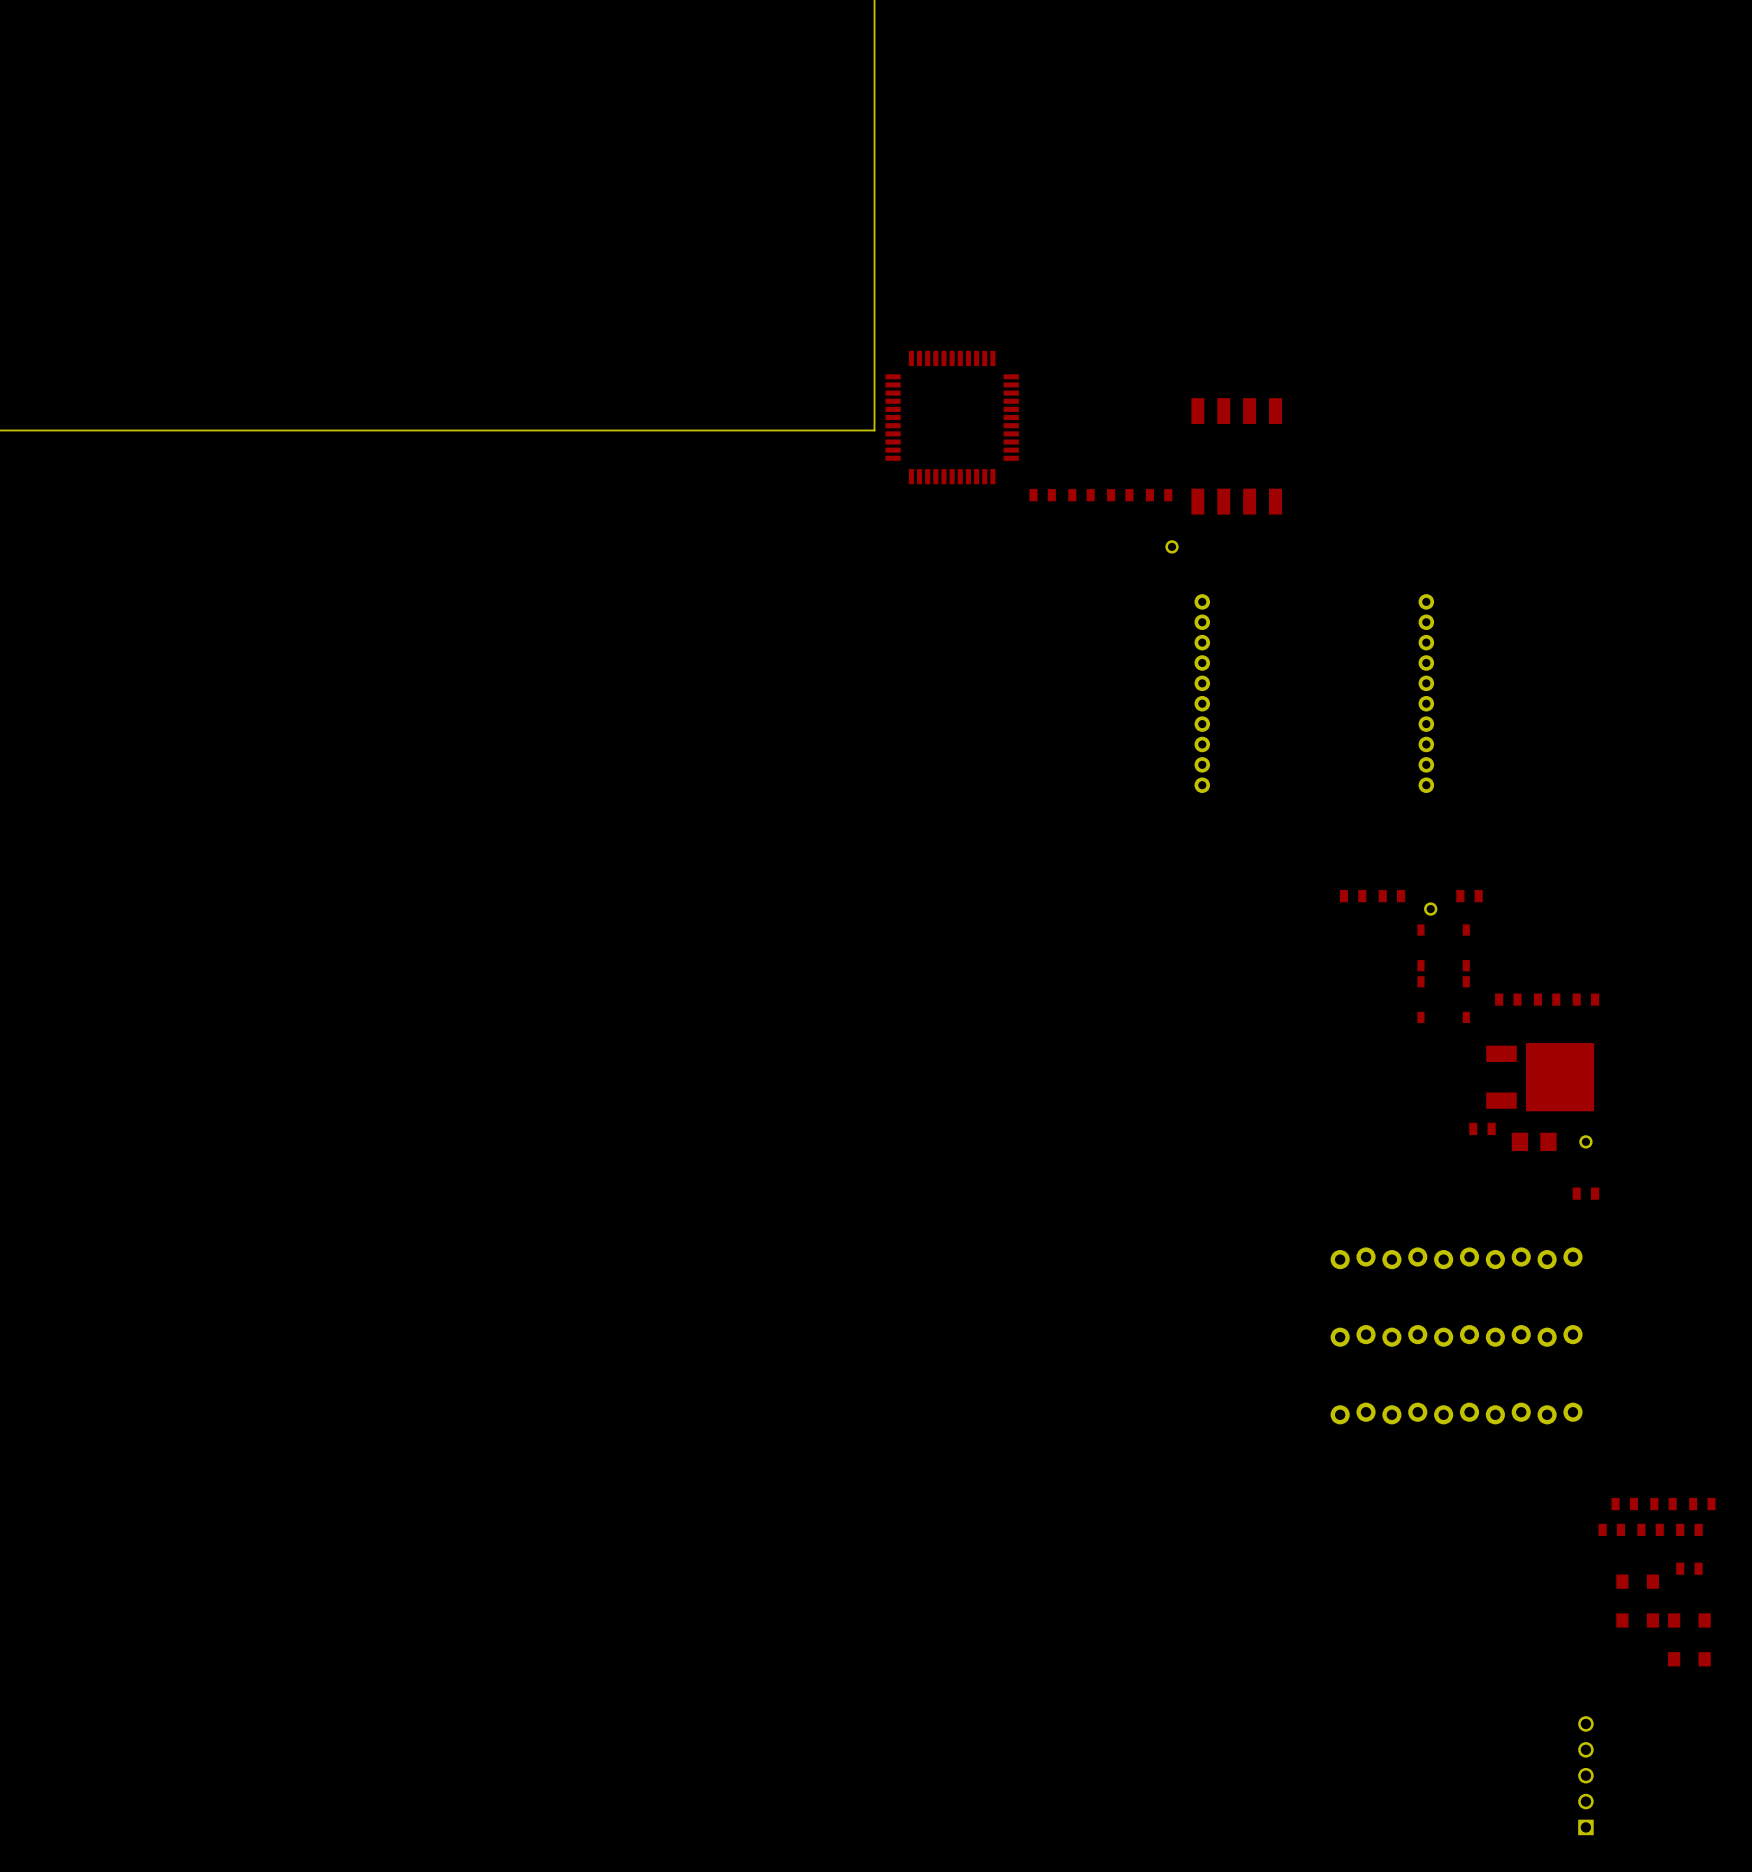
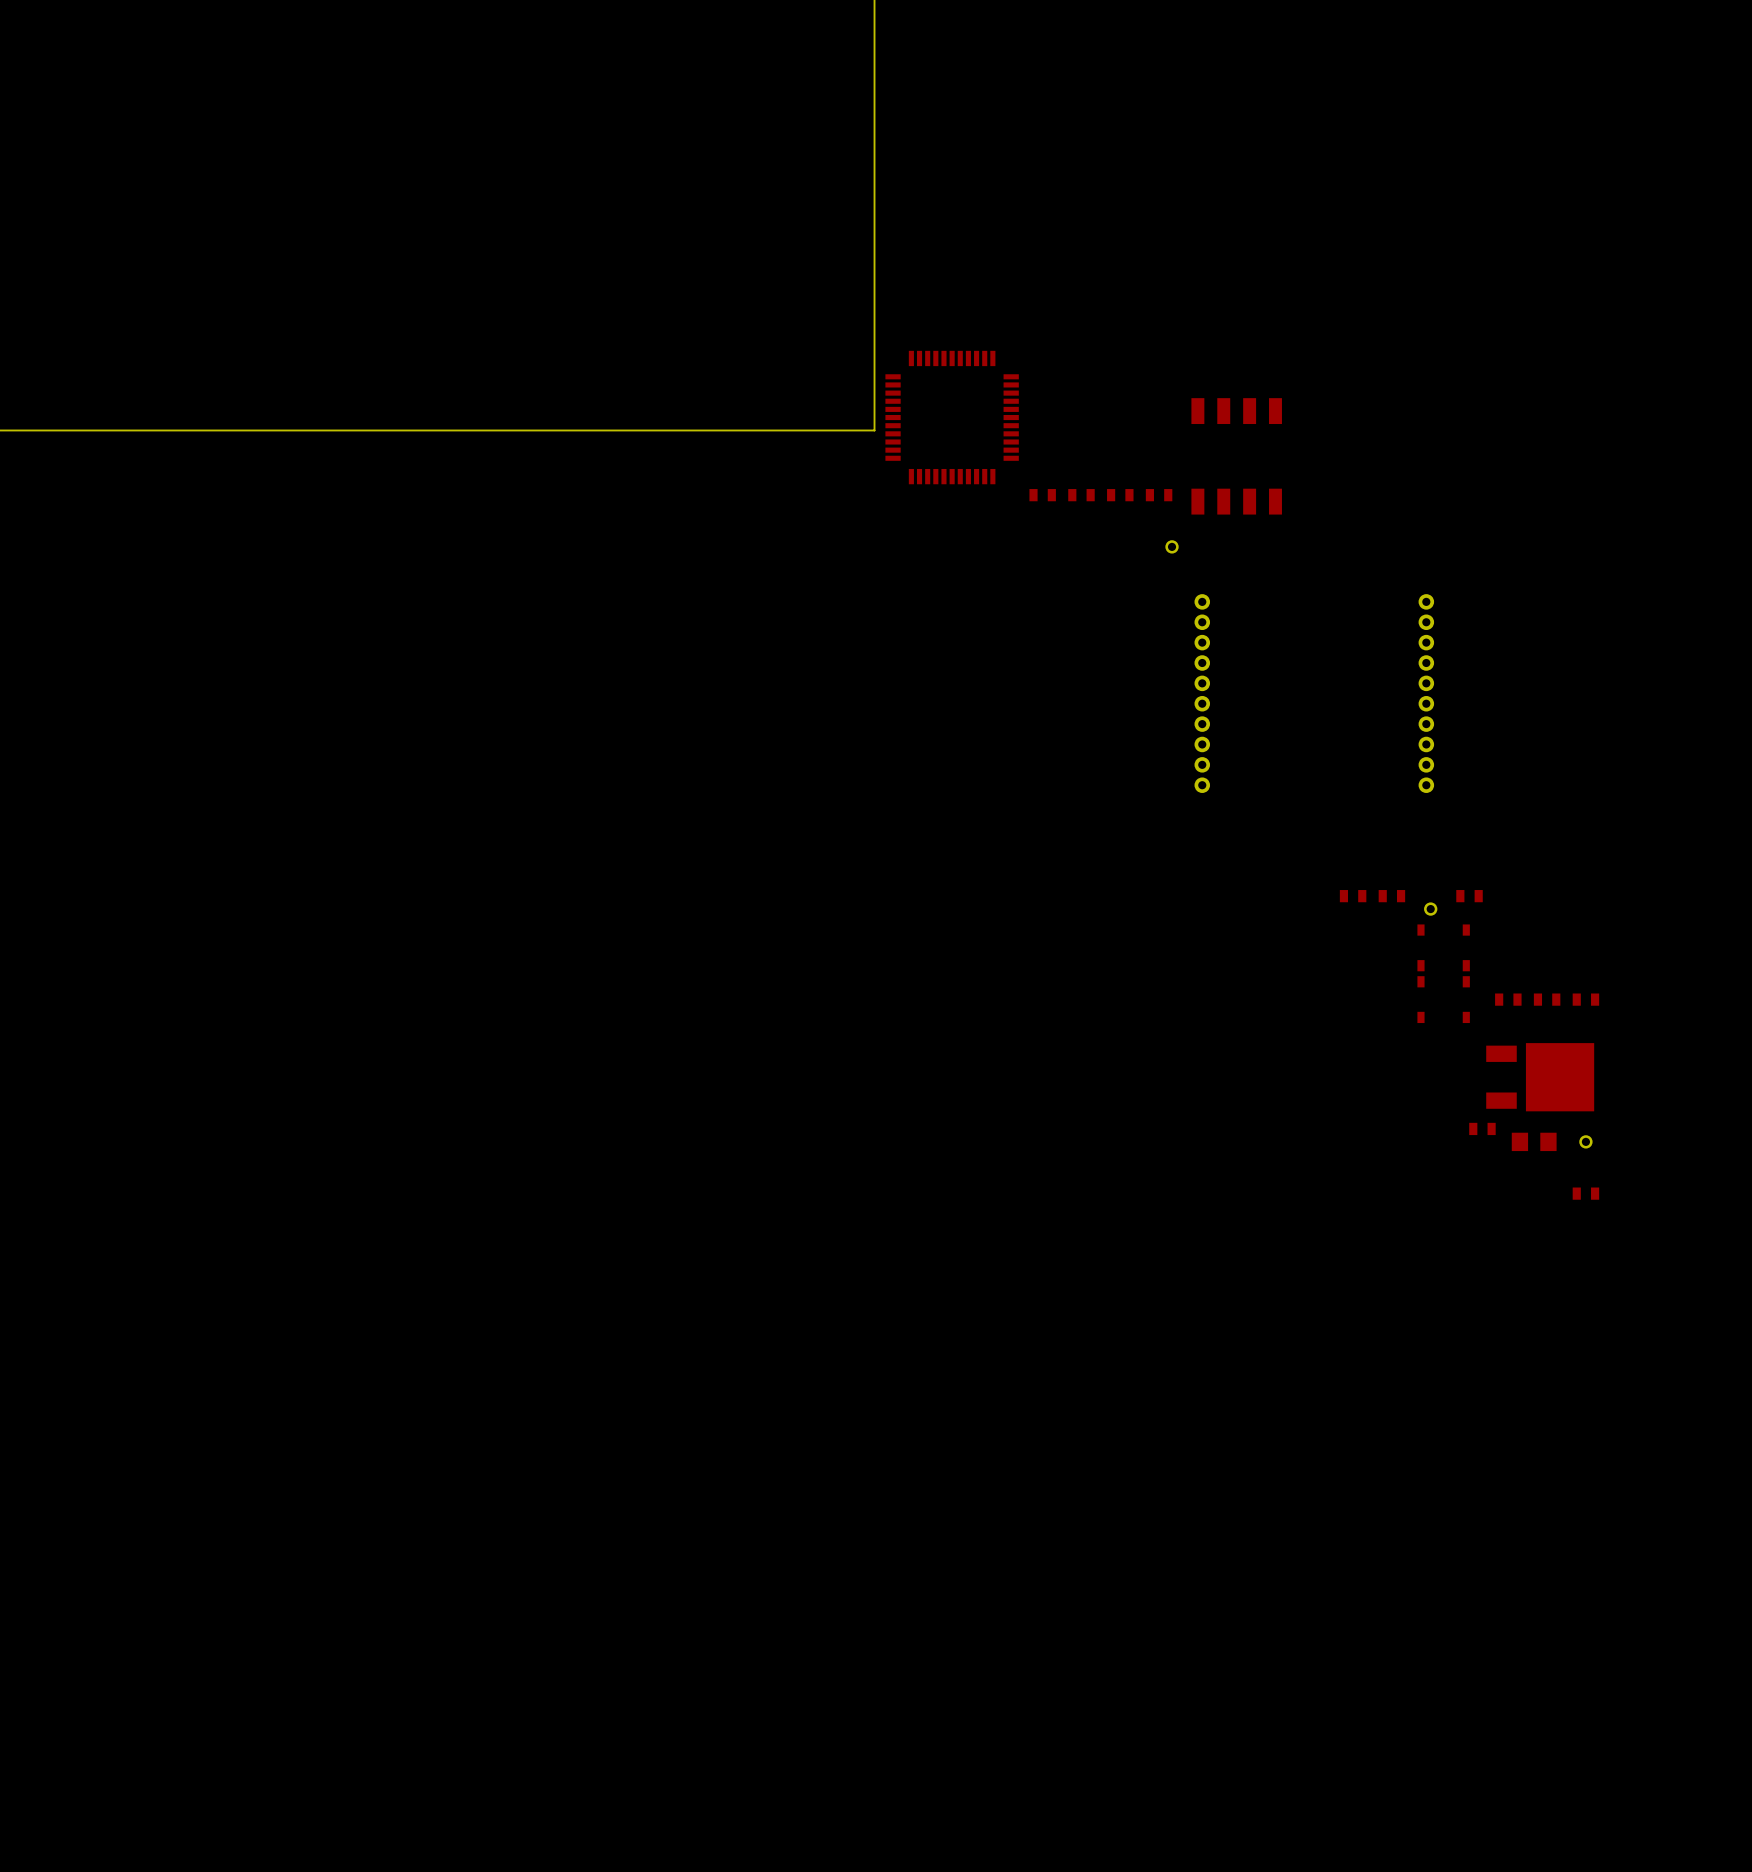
part: (1456, 1258) -> none
part: (1456, 1335) -> none
part: (1456, 1413) -> none
part: (1624, 1504) -> none
part: (1663, 1504) -> none
part: (1702, 1504) -> none
part: (1611, 1529) -> none
part: (1650, 1529) -> none
part: (1689, 1529) -> none
part: (1689, 1568) -> none
part: (1637, 1581) -> none
part: (1637, 1620) -> none
part: (1689, 1620) -> none
part: (1689, 1659) -> none
part: (1585, 1775) -> none

